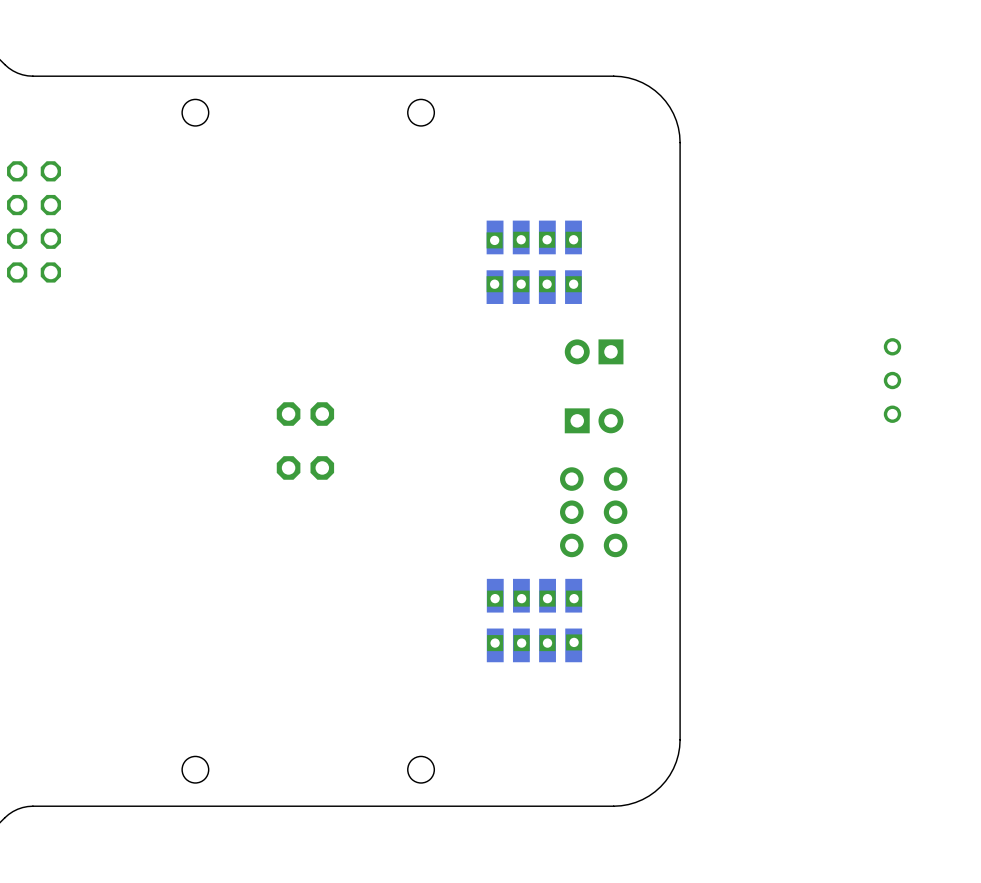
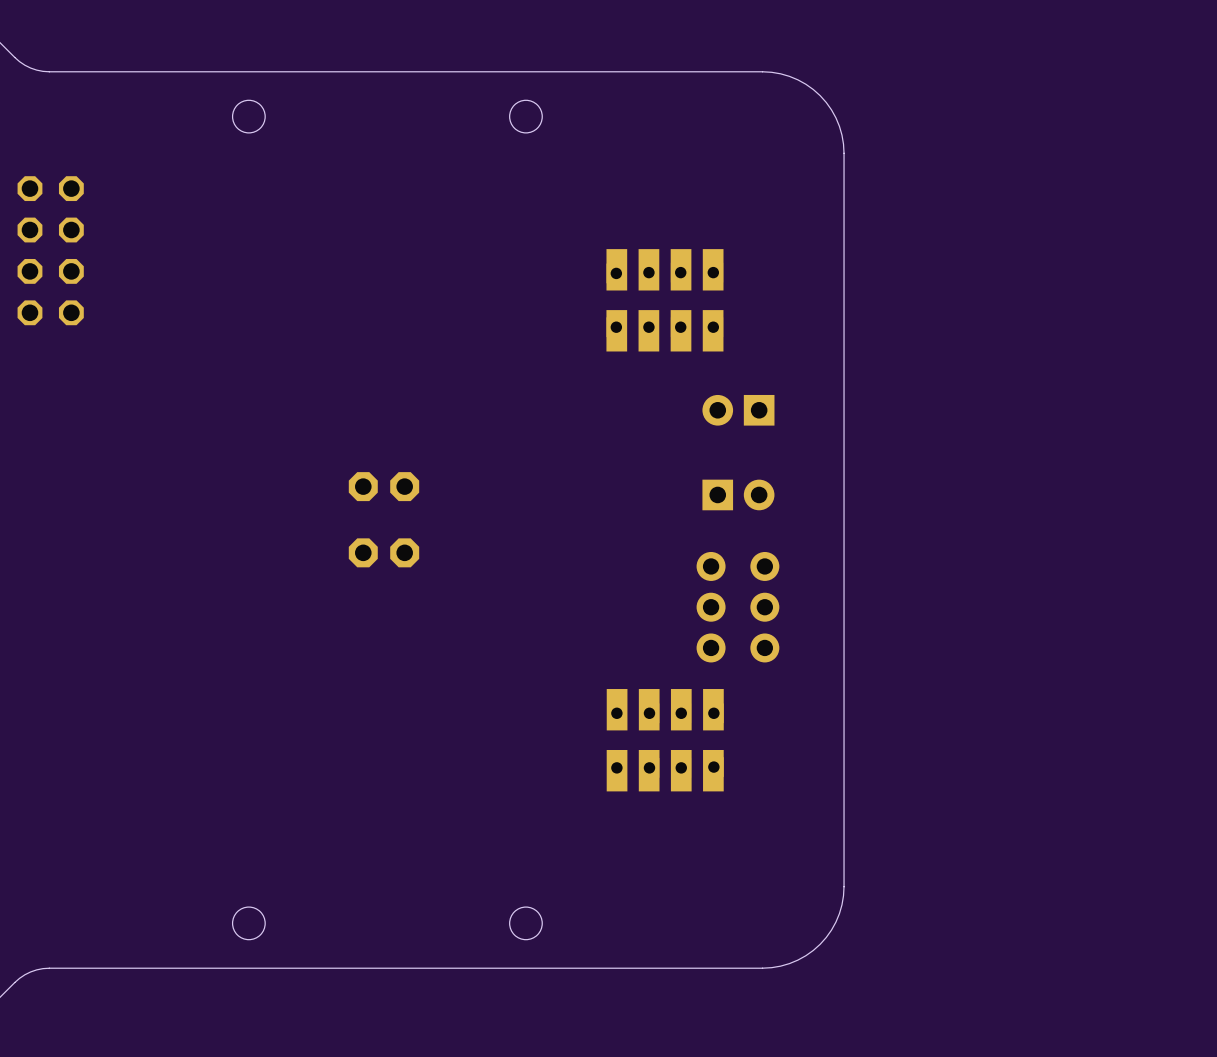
part: (892, 380) -> none

